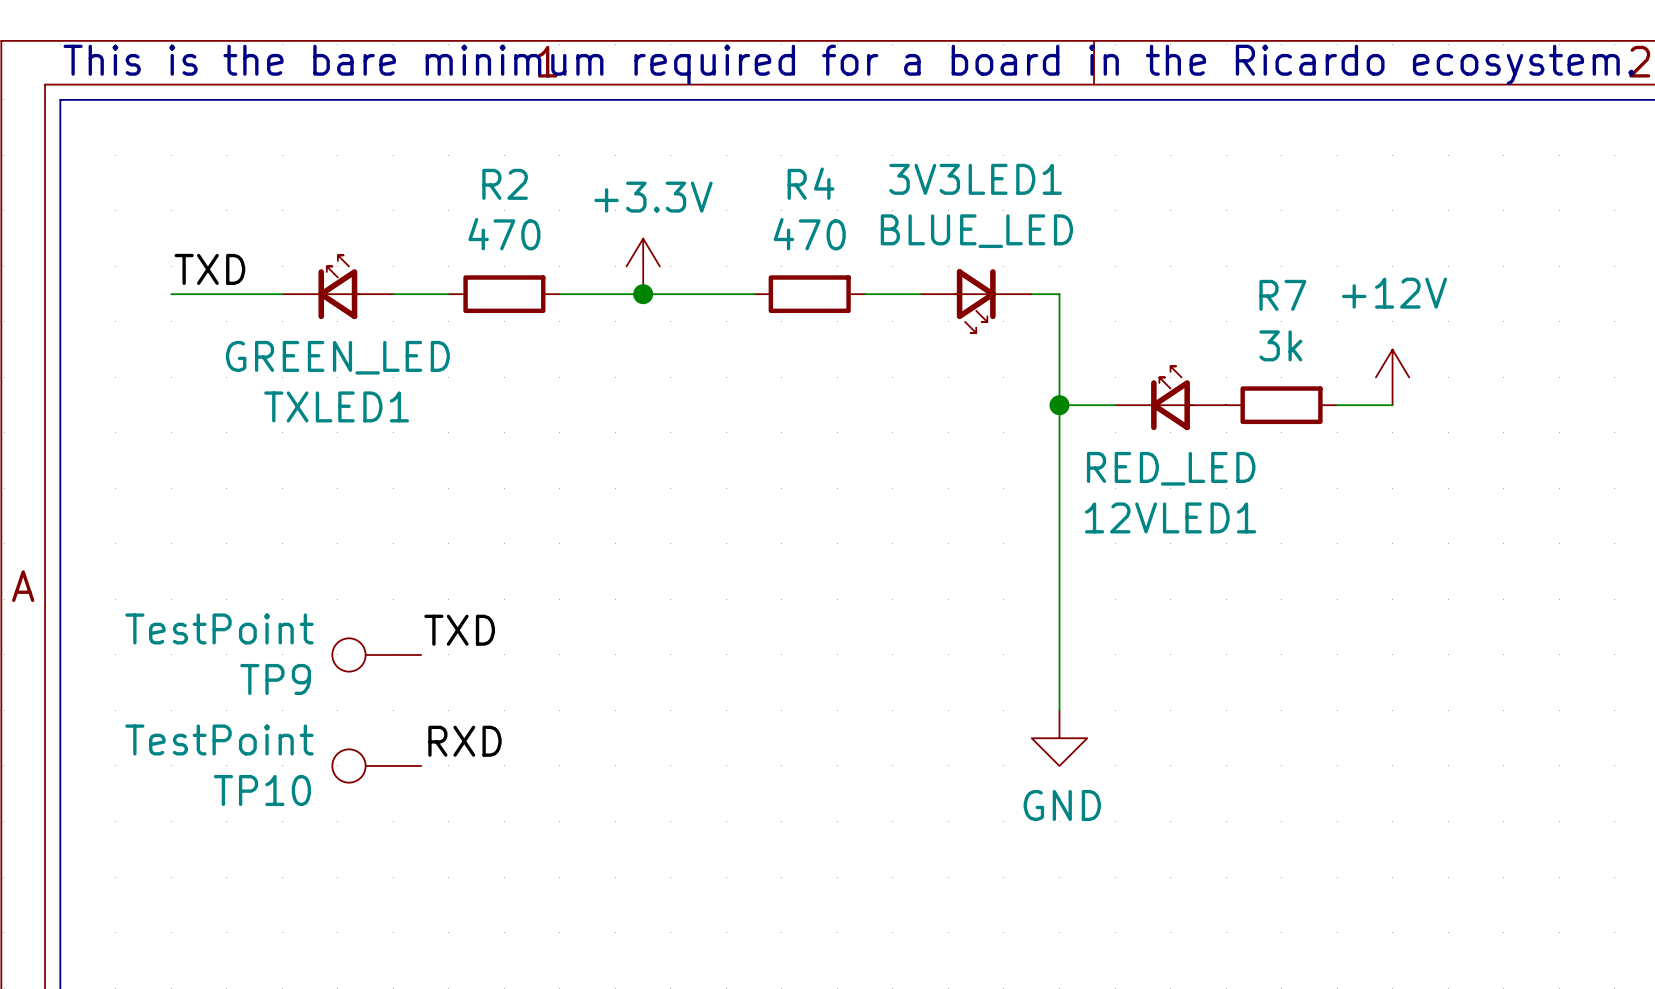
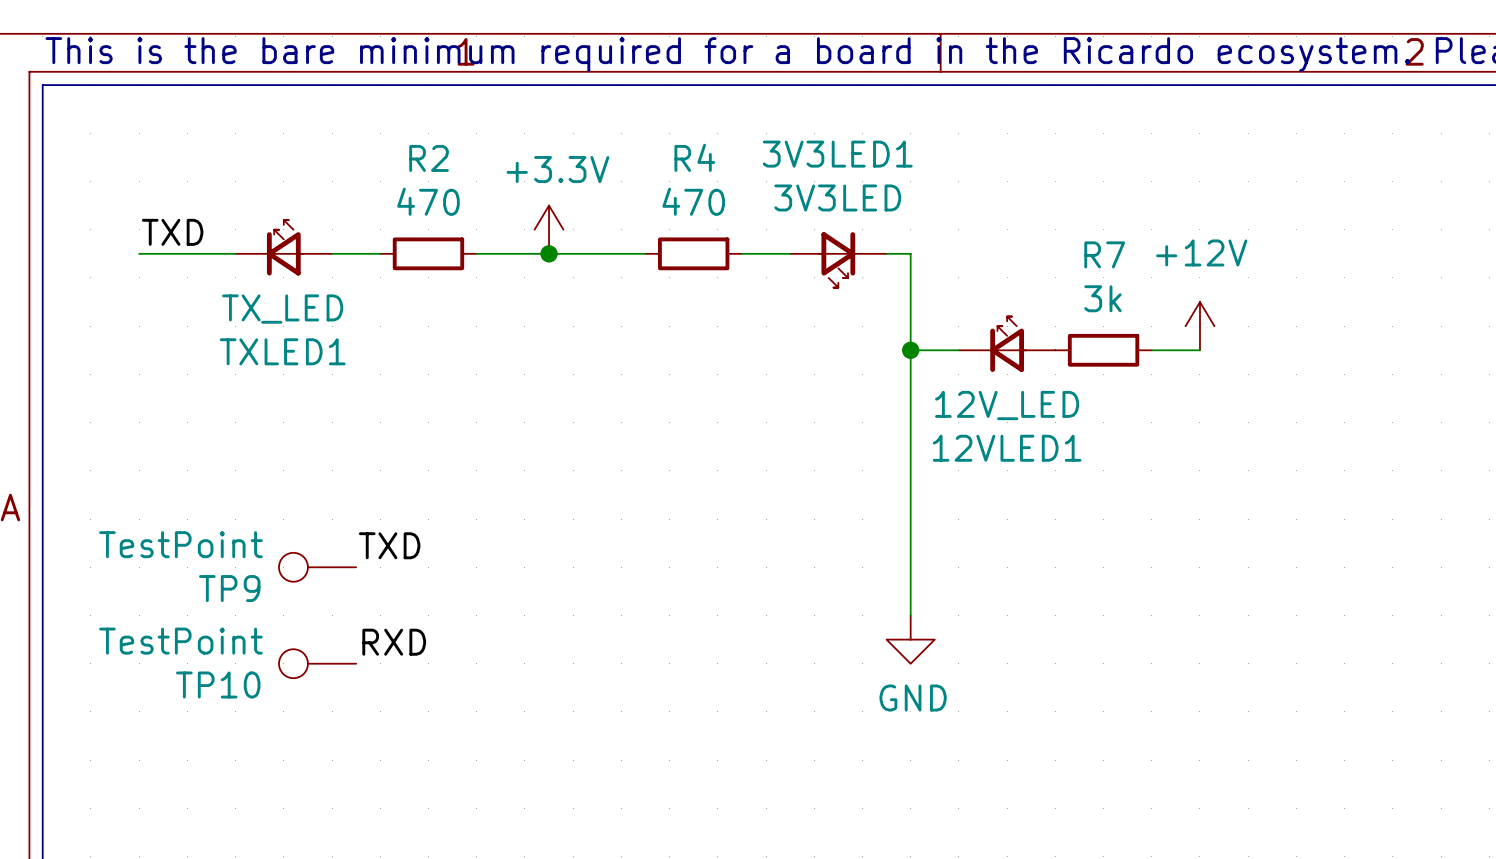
3V3LED1 value: BLUE_LED (976, 231) -> 3V3LED (837, 197)
TXLED1 value: GREEN_LED (337, 357) -> TX_LED (282, 309)
12VLED1 value: RED_LED (1171, 468) -> 12V_LED (1007, 405)

